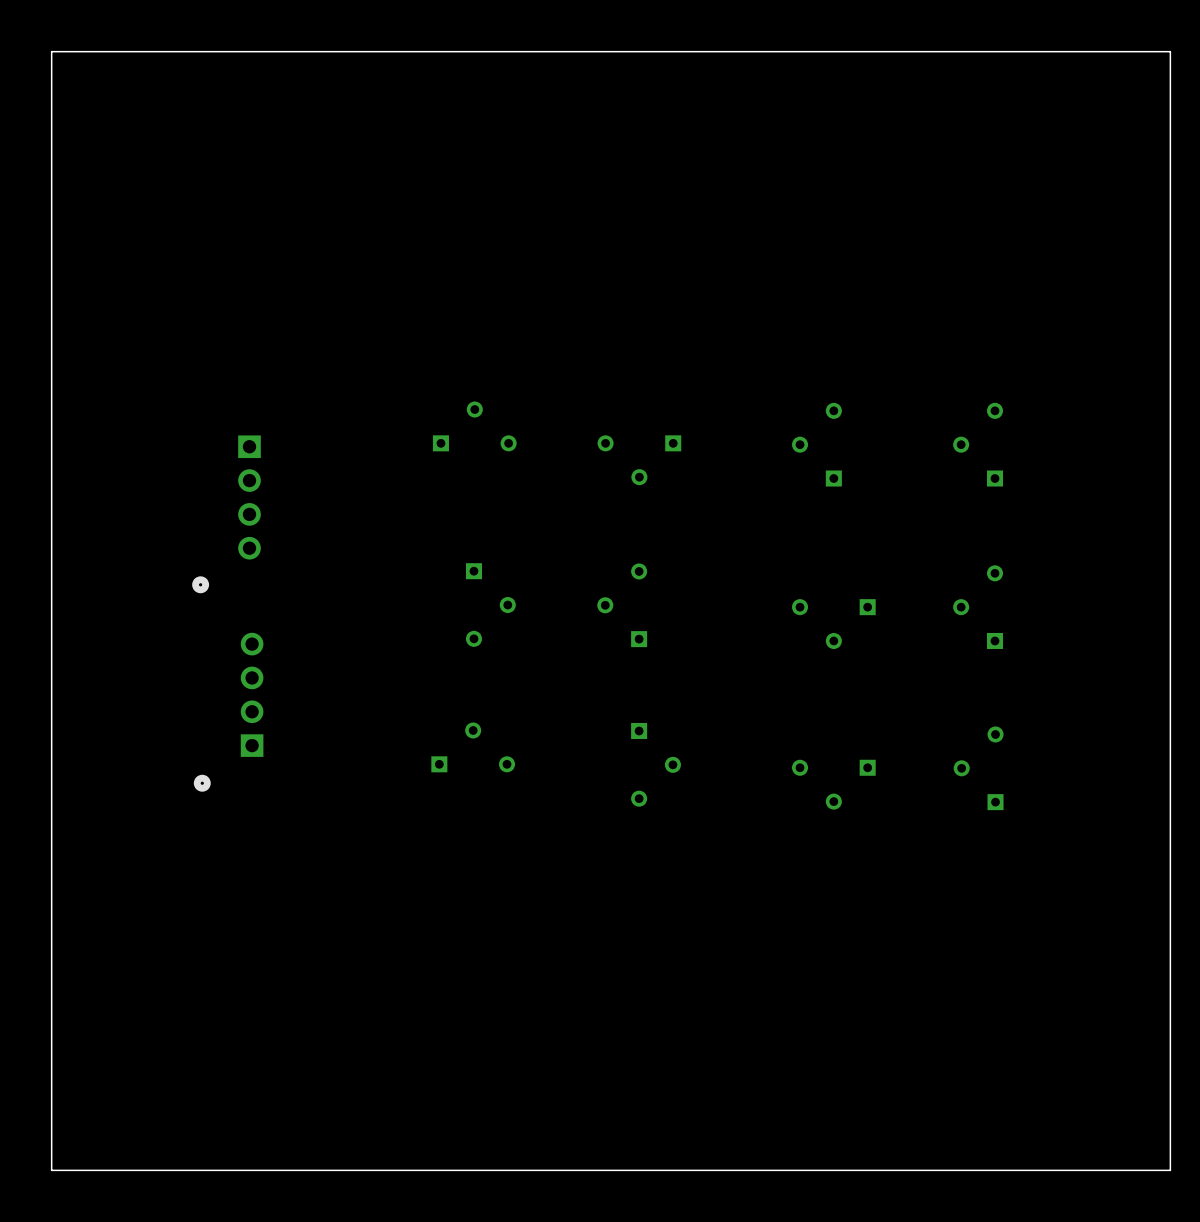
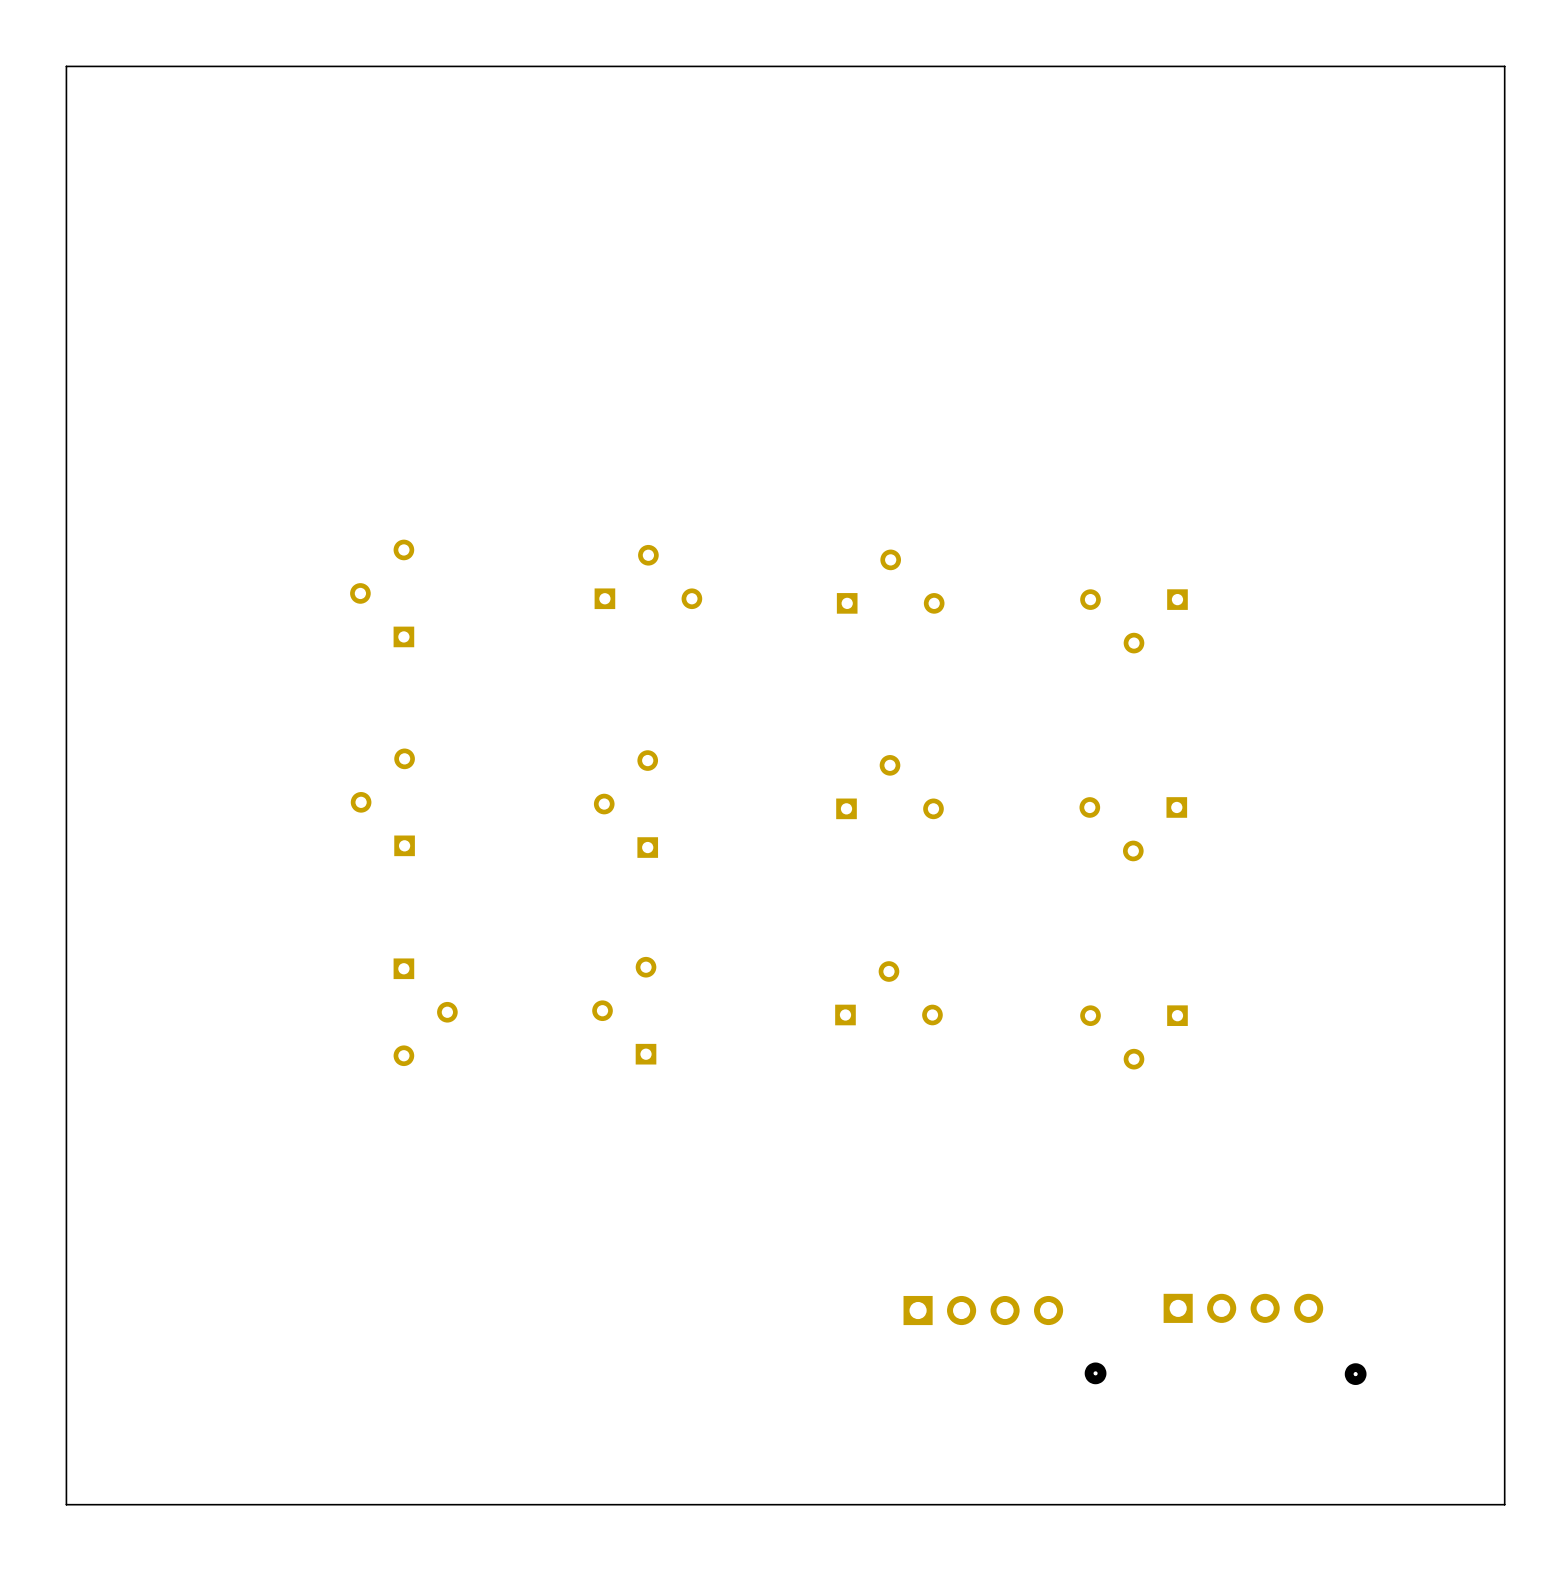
part position: (474, 426) -> (648, 577)
part: (816, 444) -> none
part: (978, 444) -> none
part rotation: 0° (639, 460) -> 180° (890, 581)
part position: (639, 460) -> (890, 581)
part: none -> (382, 593)
part: none -> (1133, 621)
part: (249, 497) -> none
part: (200, 584) -> none
part rotation: 0° (490, 605) -> 180° (625, 804)
part: (622, 605) -> none
part: (978, 607) -> none
part: none -> (890, 787)
part: none -> (382, 802)
part: (833, 624) -> none
part: none -> (1133, 829)
part: (252, 694) -> none
part rotation: 0° (473, 747) -> 90° counterclockwise (624, 1010)
part rotation: 0° (656, 764) -> 90° counterclockwise (888, 993)
part: (978, 768) -> none
part: (202, 783) -> none
part: (833, 784) -> none
part: none -> (425, 1012)
part: none -> (1133, 1037)
part: none -> (1243, 1308)
part: none -> (983, 1310)
part: none -> (1095, 1373)
part: none -> (1355, 1374)

